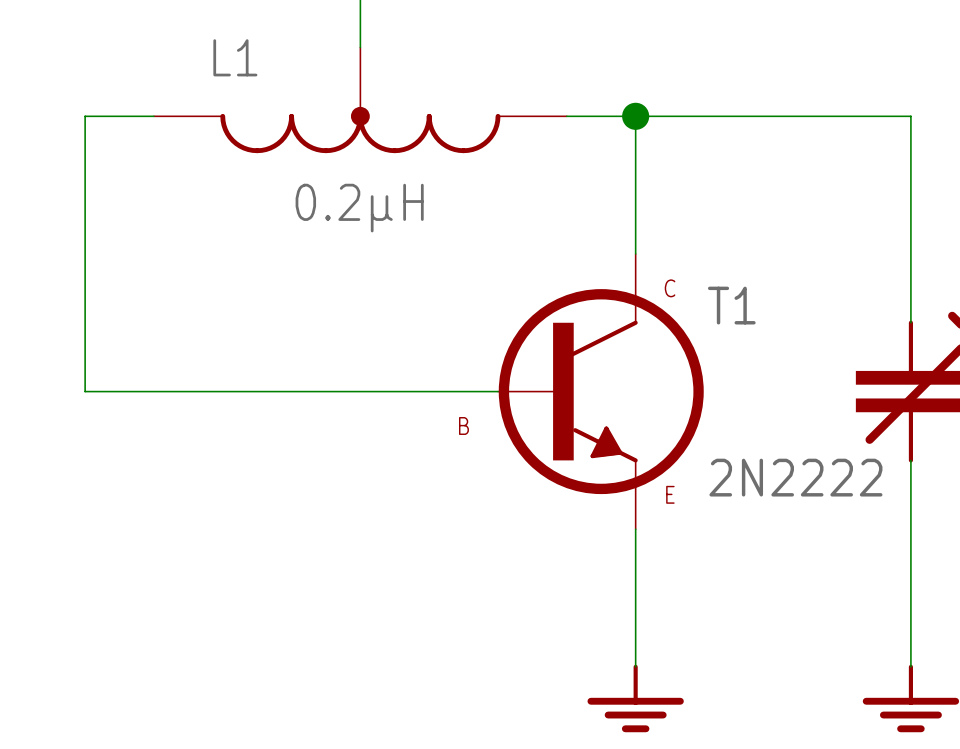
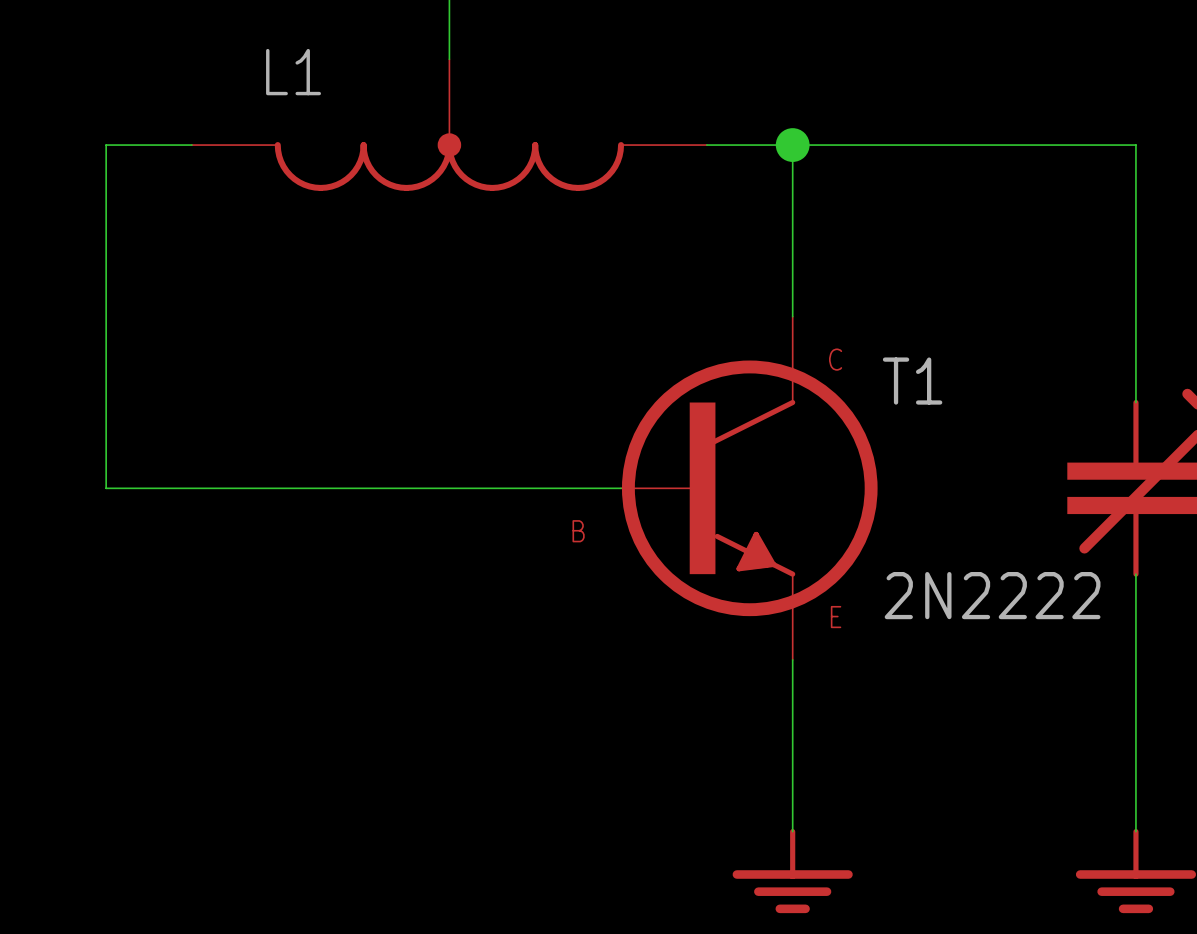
L1 value: 0.2μH (359, 208) -> none

